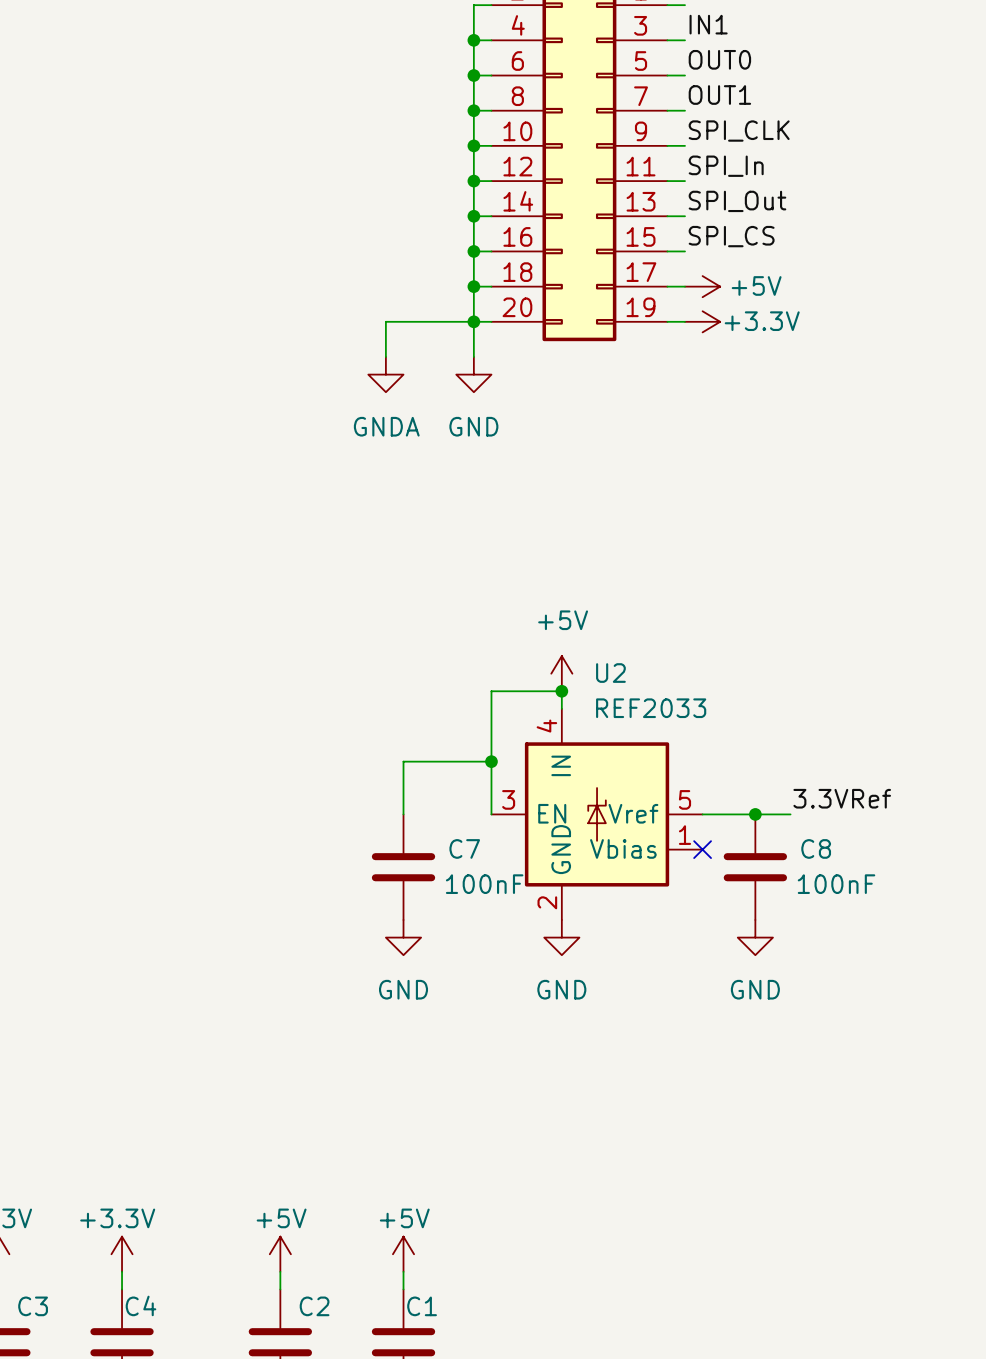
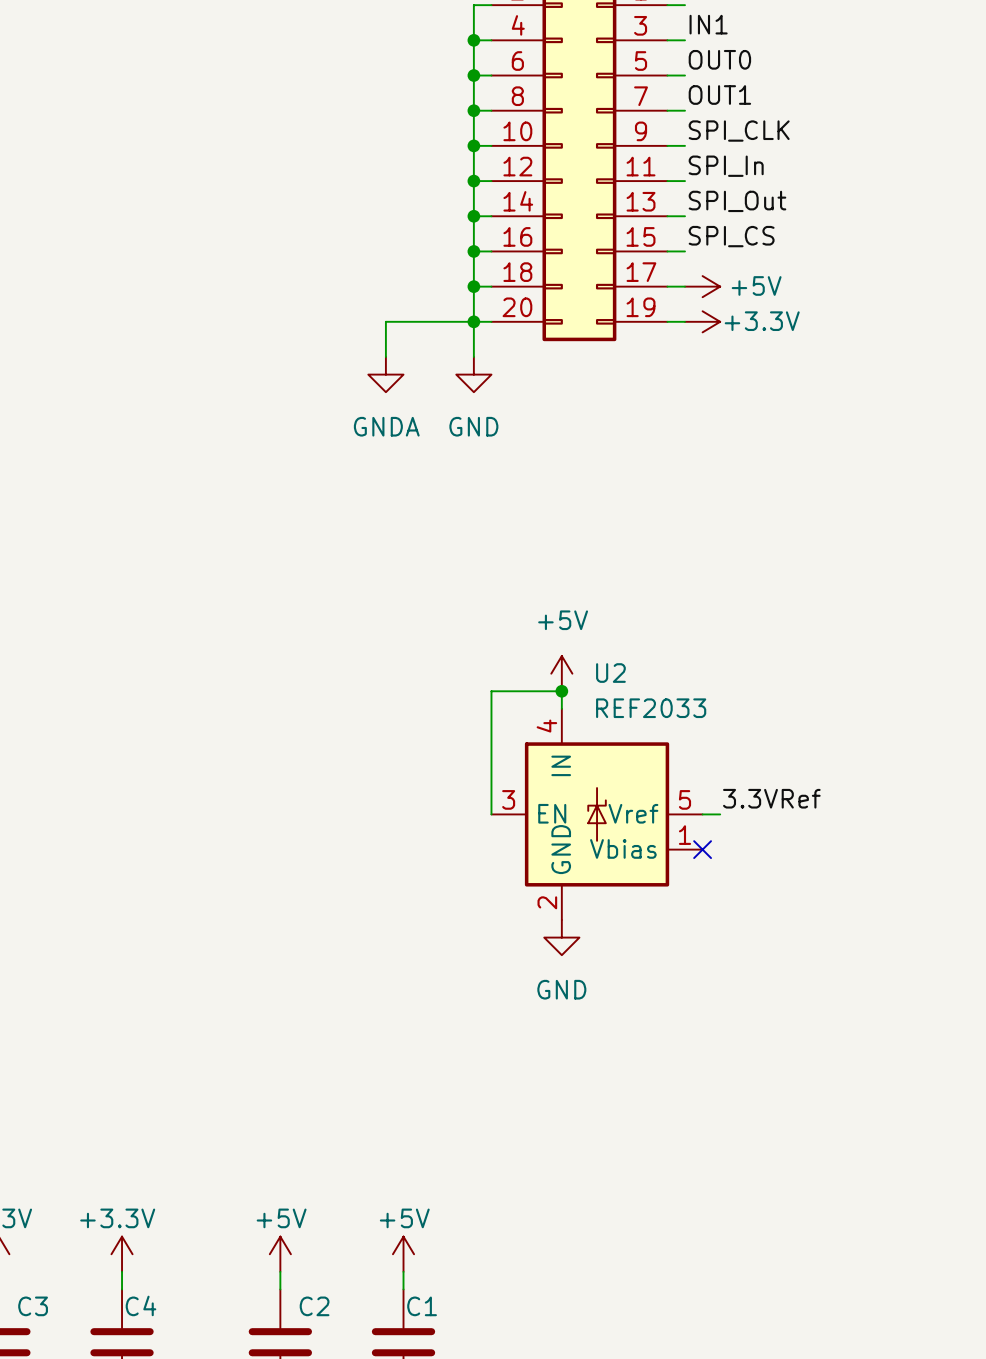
wire: (491, 761) (403, 761) (403, 814) -> none
junction: (491, 761) -> none
label position: 3.3VRef (842, 798) -> 3.3VRef (771, 798)
wire: (720, 814) (790, 814) -> none
junction: (755, 814) -> none
C7: 100nF (403, 867) -> none
C8: 100nF (755, 867) -> none
power symbol: GND (403, 937) -> none
power symbol: GND (755, 937) -> none

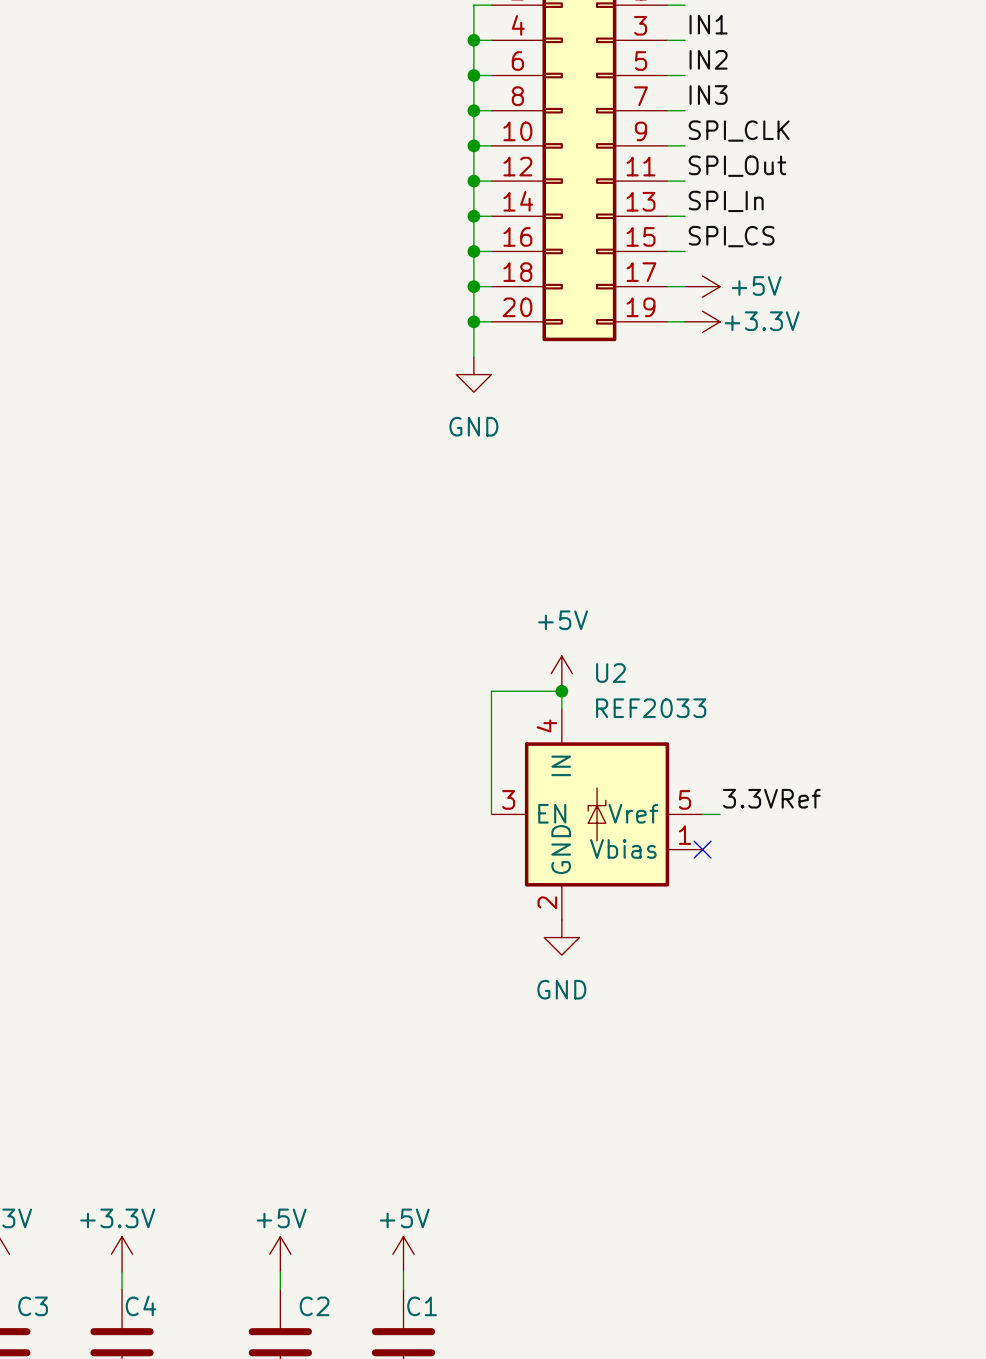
label: OUT0 (719, 59) -> IN2 (708, 59)
label: OUT1 (719, 95) -> IN3 (708, 95)
label: SPI_In (726, 166) -> SPI_Out (737, 166)
label: SPI_Out (737, 201) -> SPI_In (726, 201)
wire: (473, 321) (385, 321) (385, 357) -> none
power symbol: GNDA (385, 374) -> none

